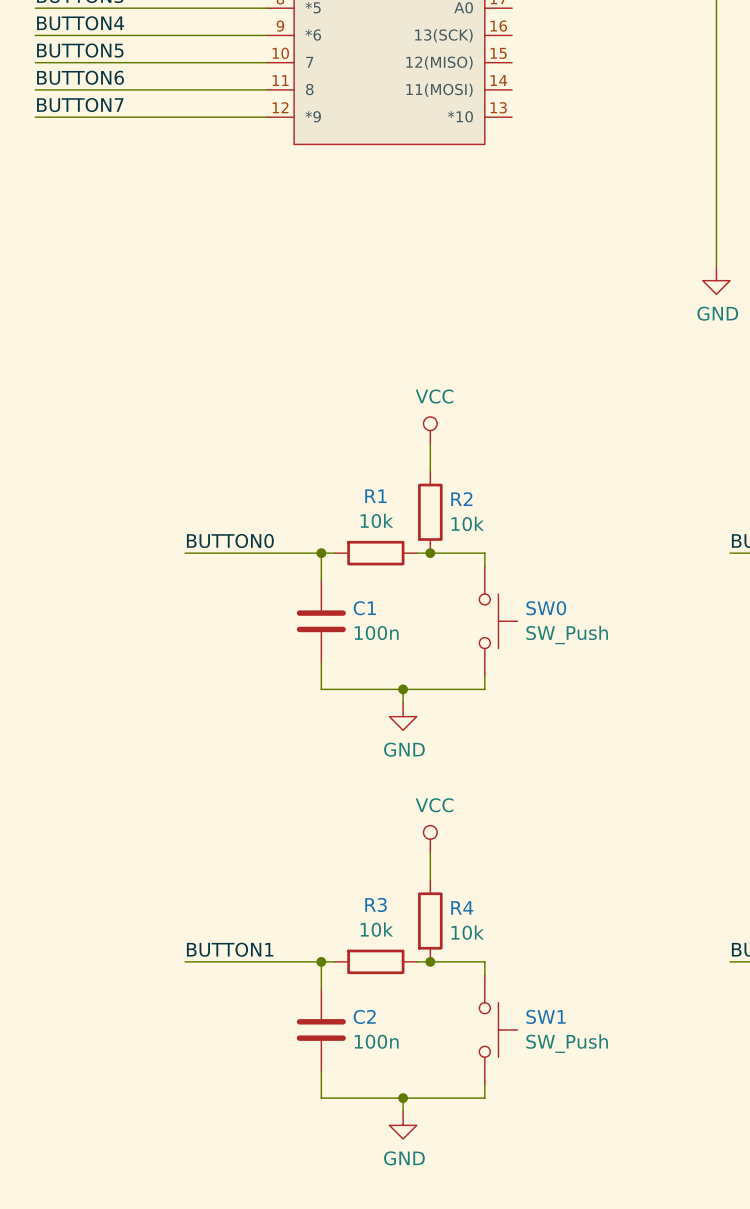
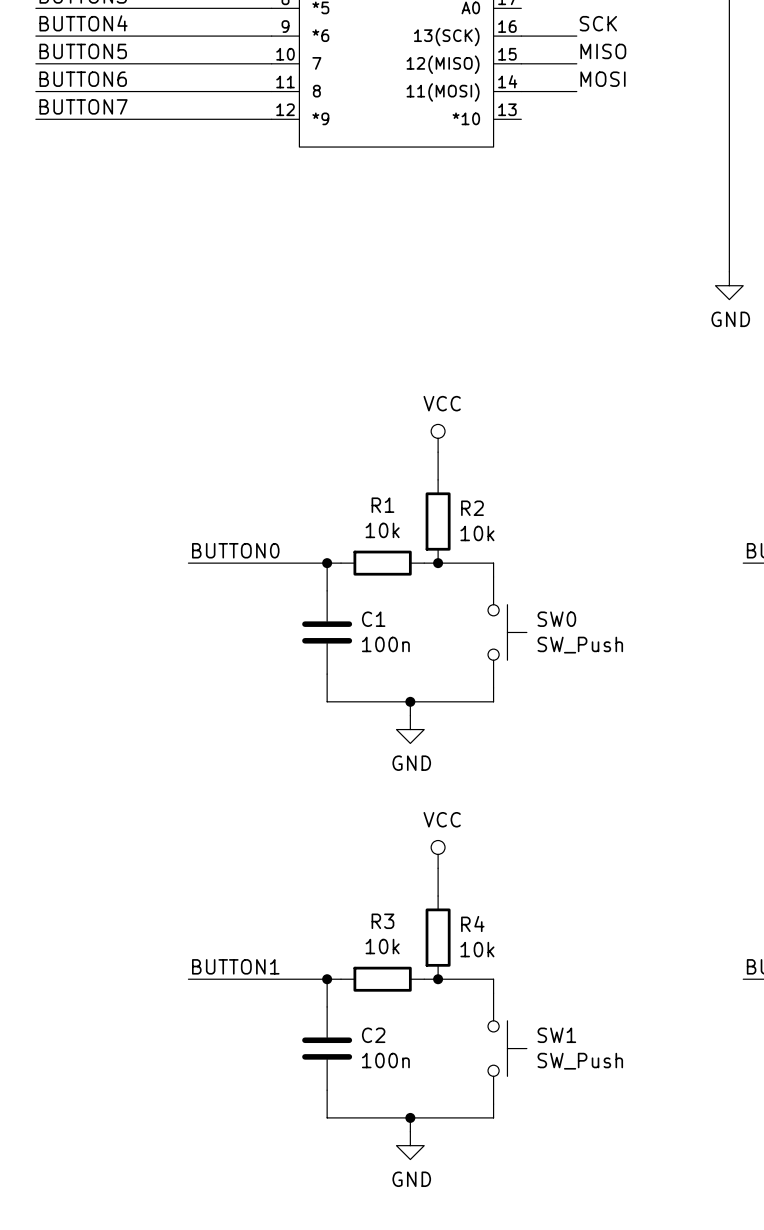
label: none -> SCK (598, 23)
wire: none -> (521, 36) (576, 36)
label: none -> MISO (603, 51)
wire: none -> (521, 63) (576, 63)
label: none -> MOSI (602, 79)
wire: none -> (521, 91) (576, 91)

